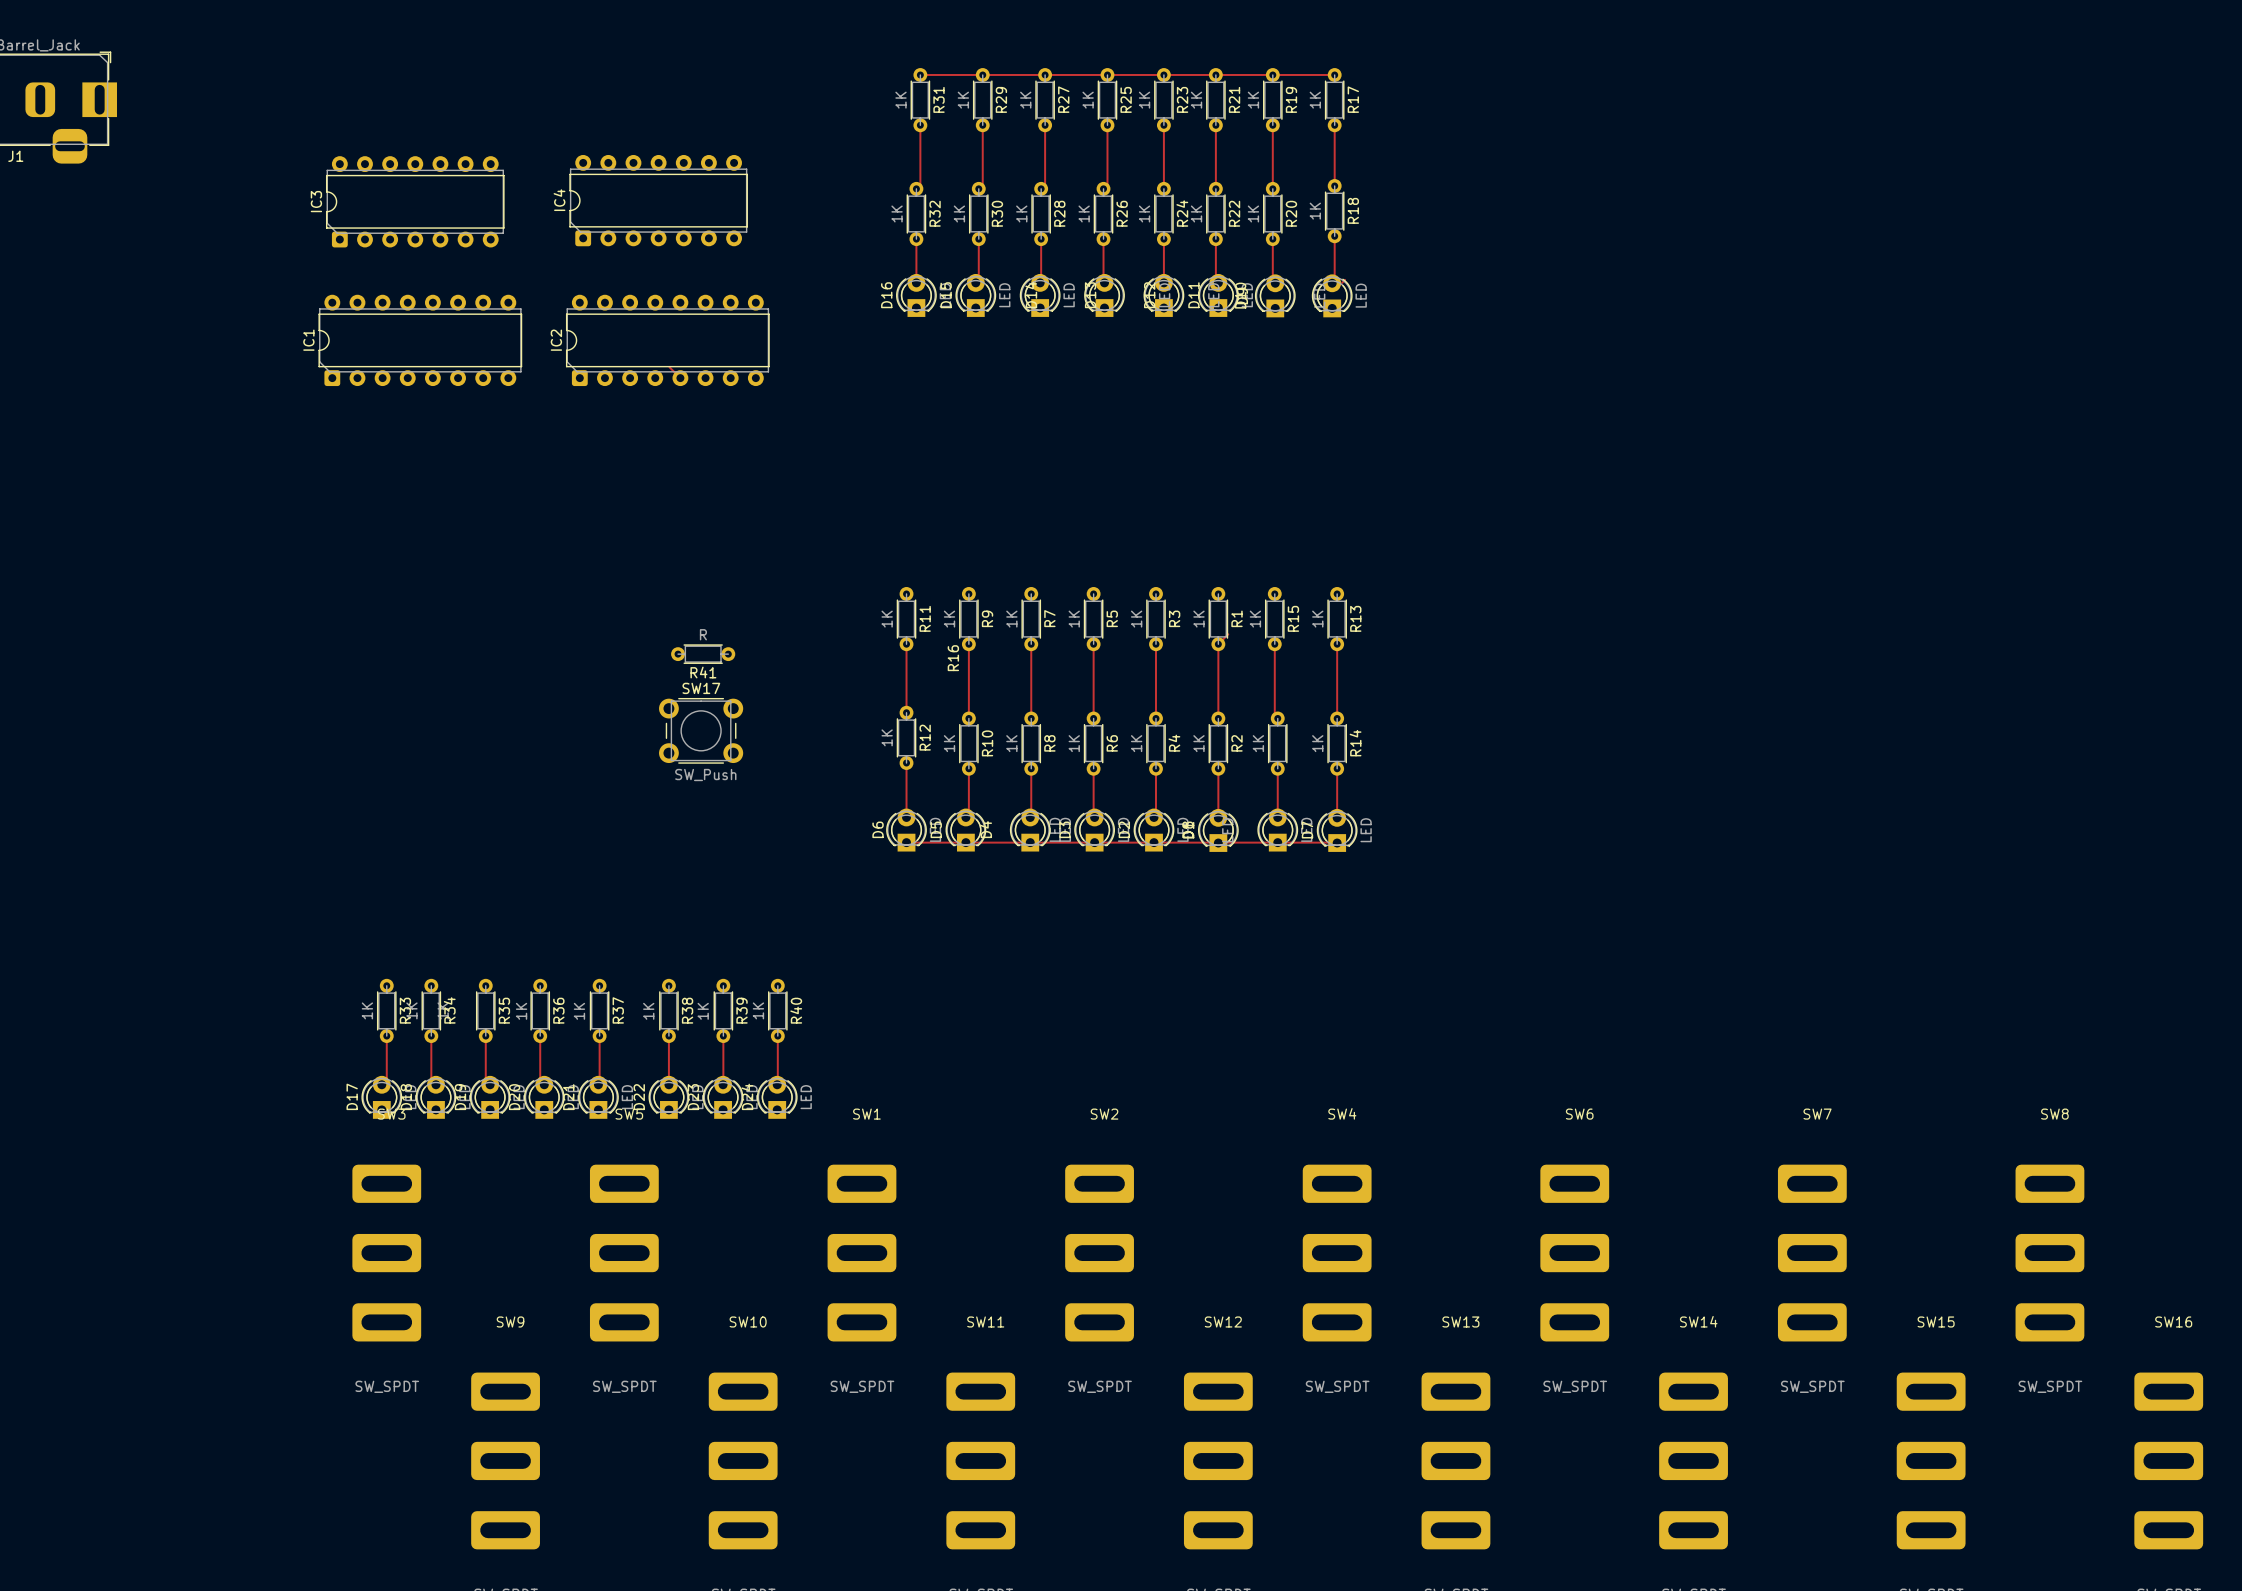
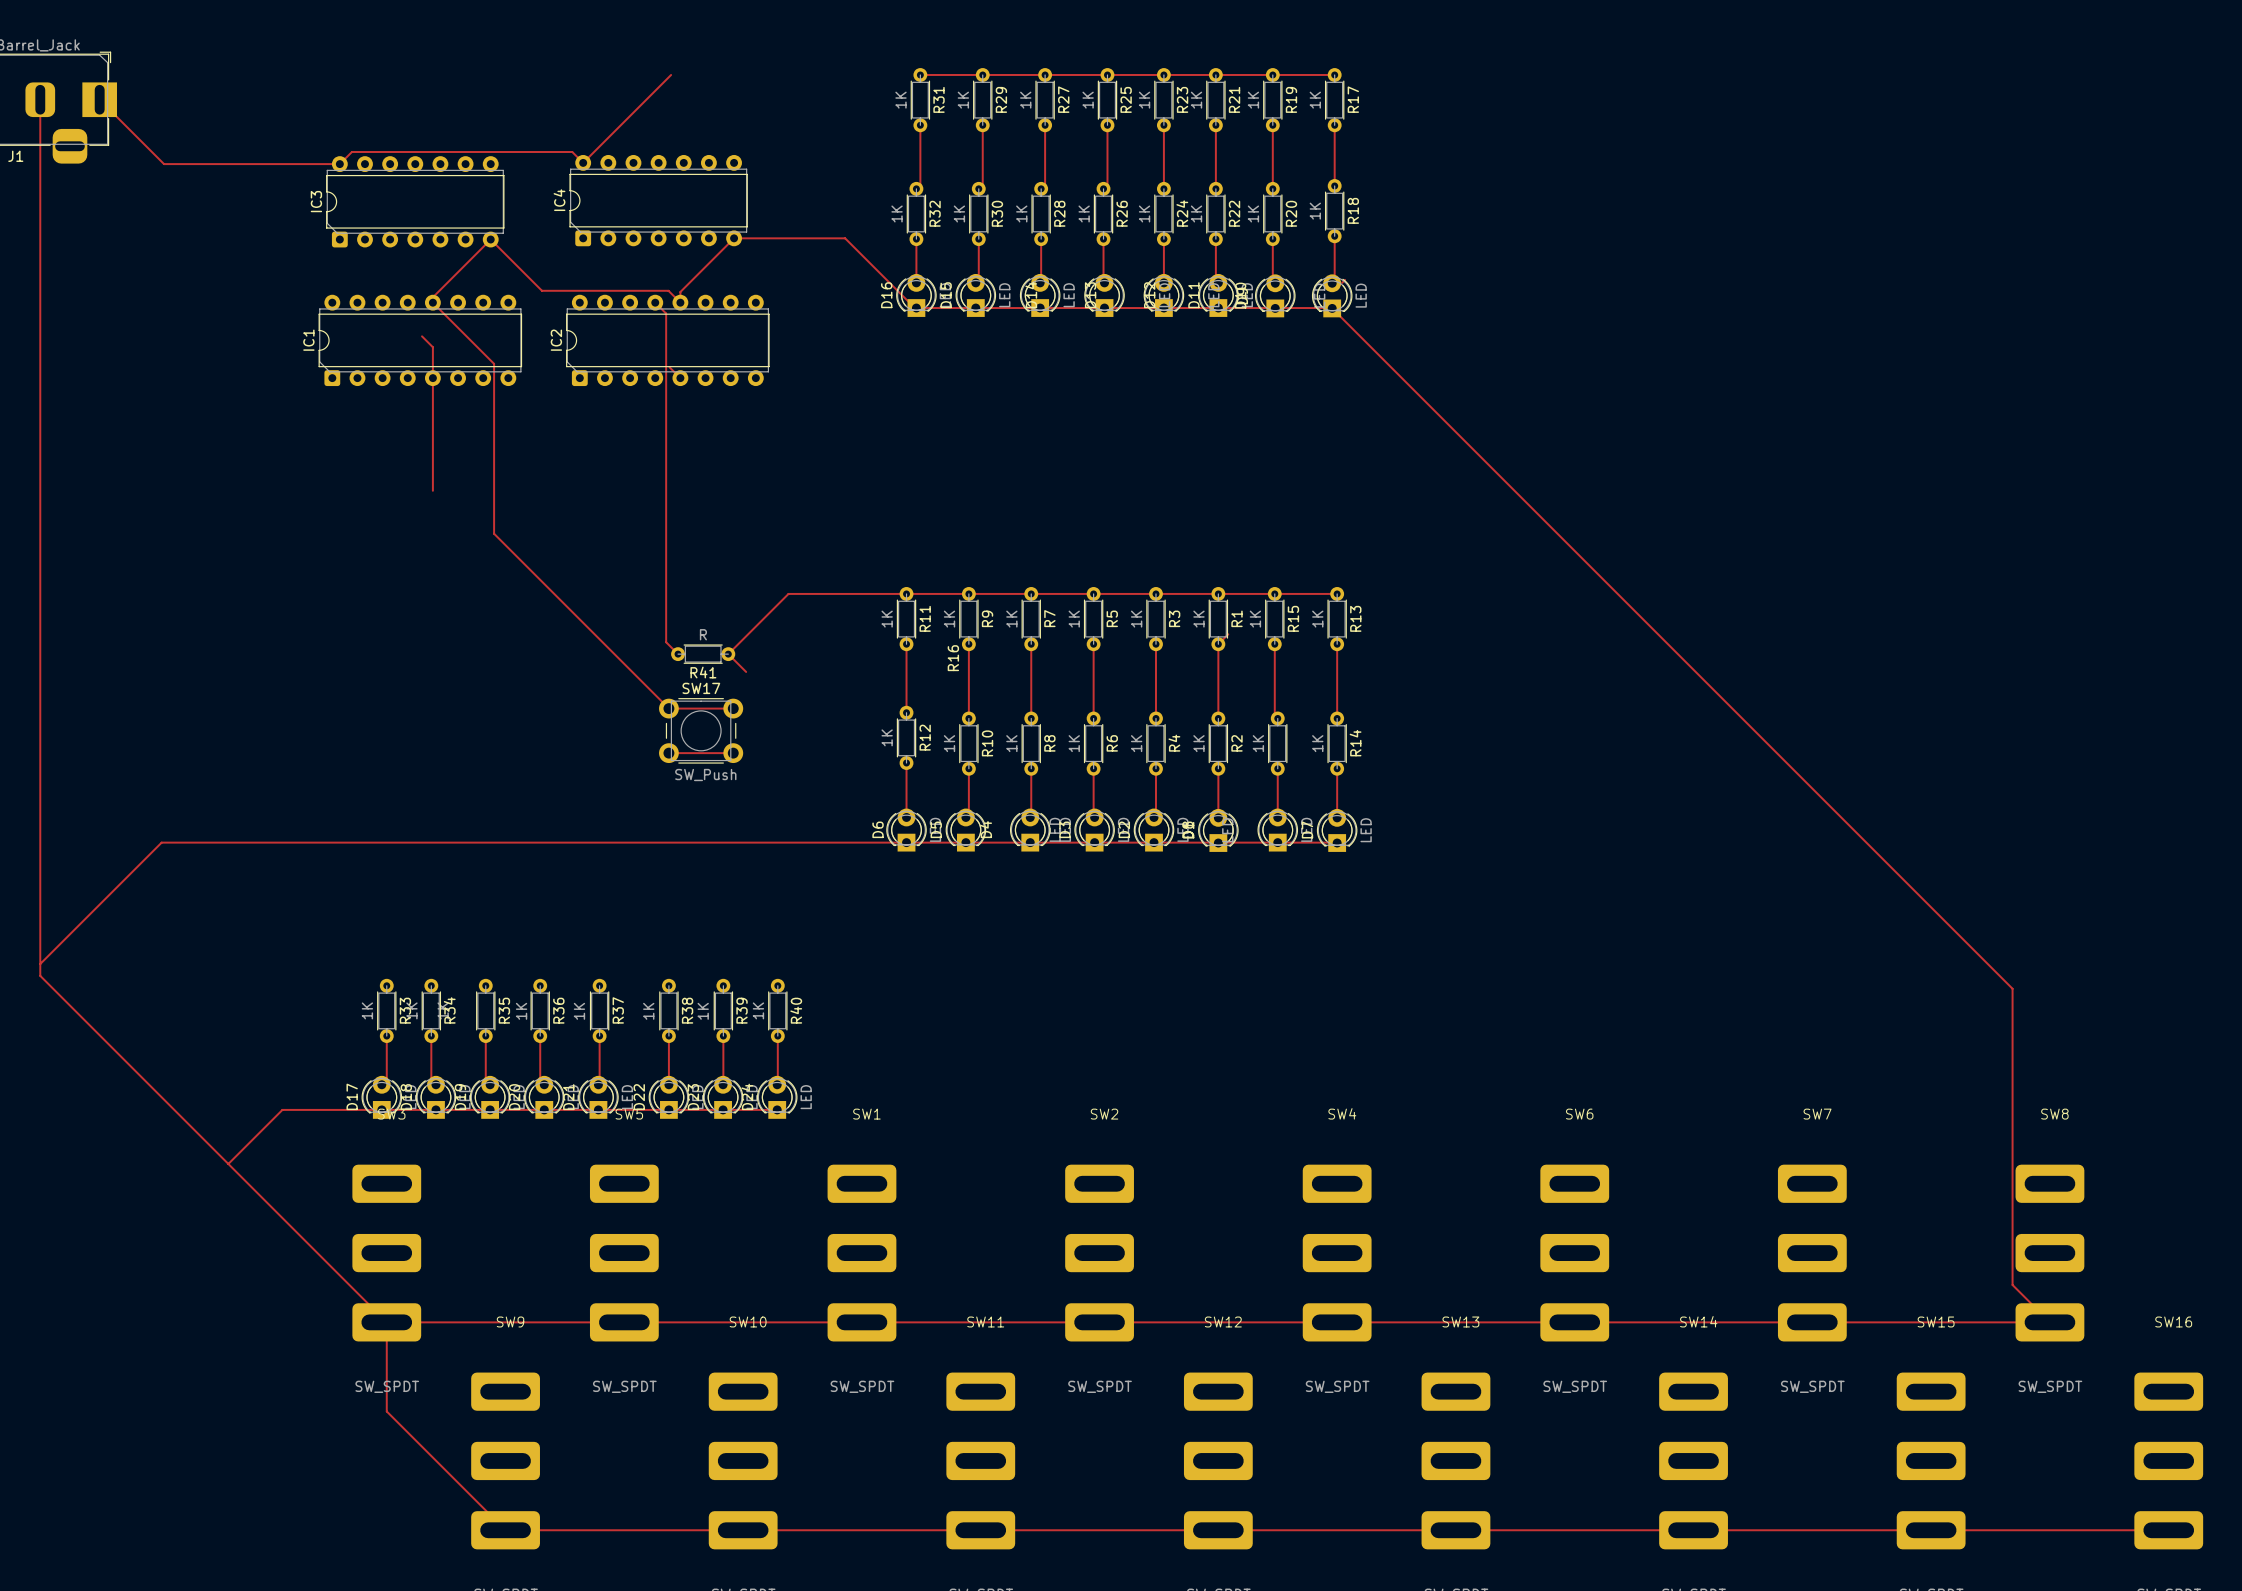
top track: none -> (671, 74) (583, 162) (572, 152) (351, 152) (339, 164) (164, 164) (99, 99)
top track: none -> (40, 99) (40, 975) (386, 1322)
top track: none -> (655, 302) (666, 313) (666, 642) (678, 654)
top track: none -> (422, 336) (432, 347) (432, 490)
top track: none -> (1337, 593) (788, 593) (728, 654) (746, 671)
top track: none -> (733, 708) (668, 708) (494, 533) (494, 363) (432, 302) (432, 297) (490, 239) (542, 290) (668, 290) (680, 302) (680, 291) (734, 238) (845, 238) (914, 308) (1331, 308) (2012, 988) (2012, 1284) (2049, 1322) (386, 1322)
top track: none -> (668, 753) (733, 753)
top track: none -> (906, 842) (161, 842) (40, 963)
top track: none -> (777, 1109) (282, 1109) (228, 1163)
top track: none -> (386, 1322) (386, 1411) (505, 1530) (2168, 1530)

